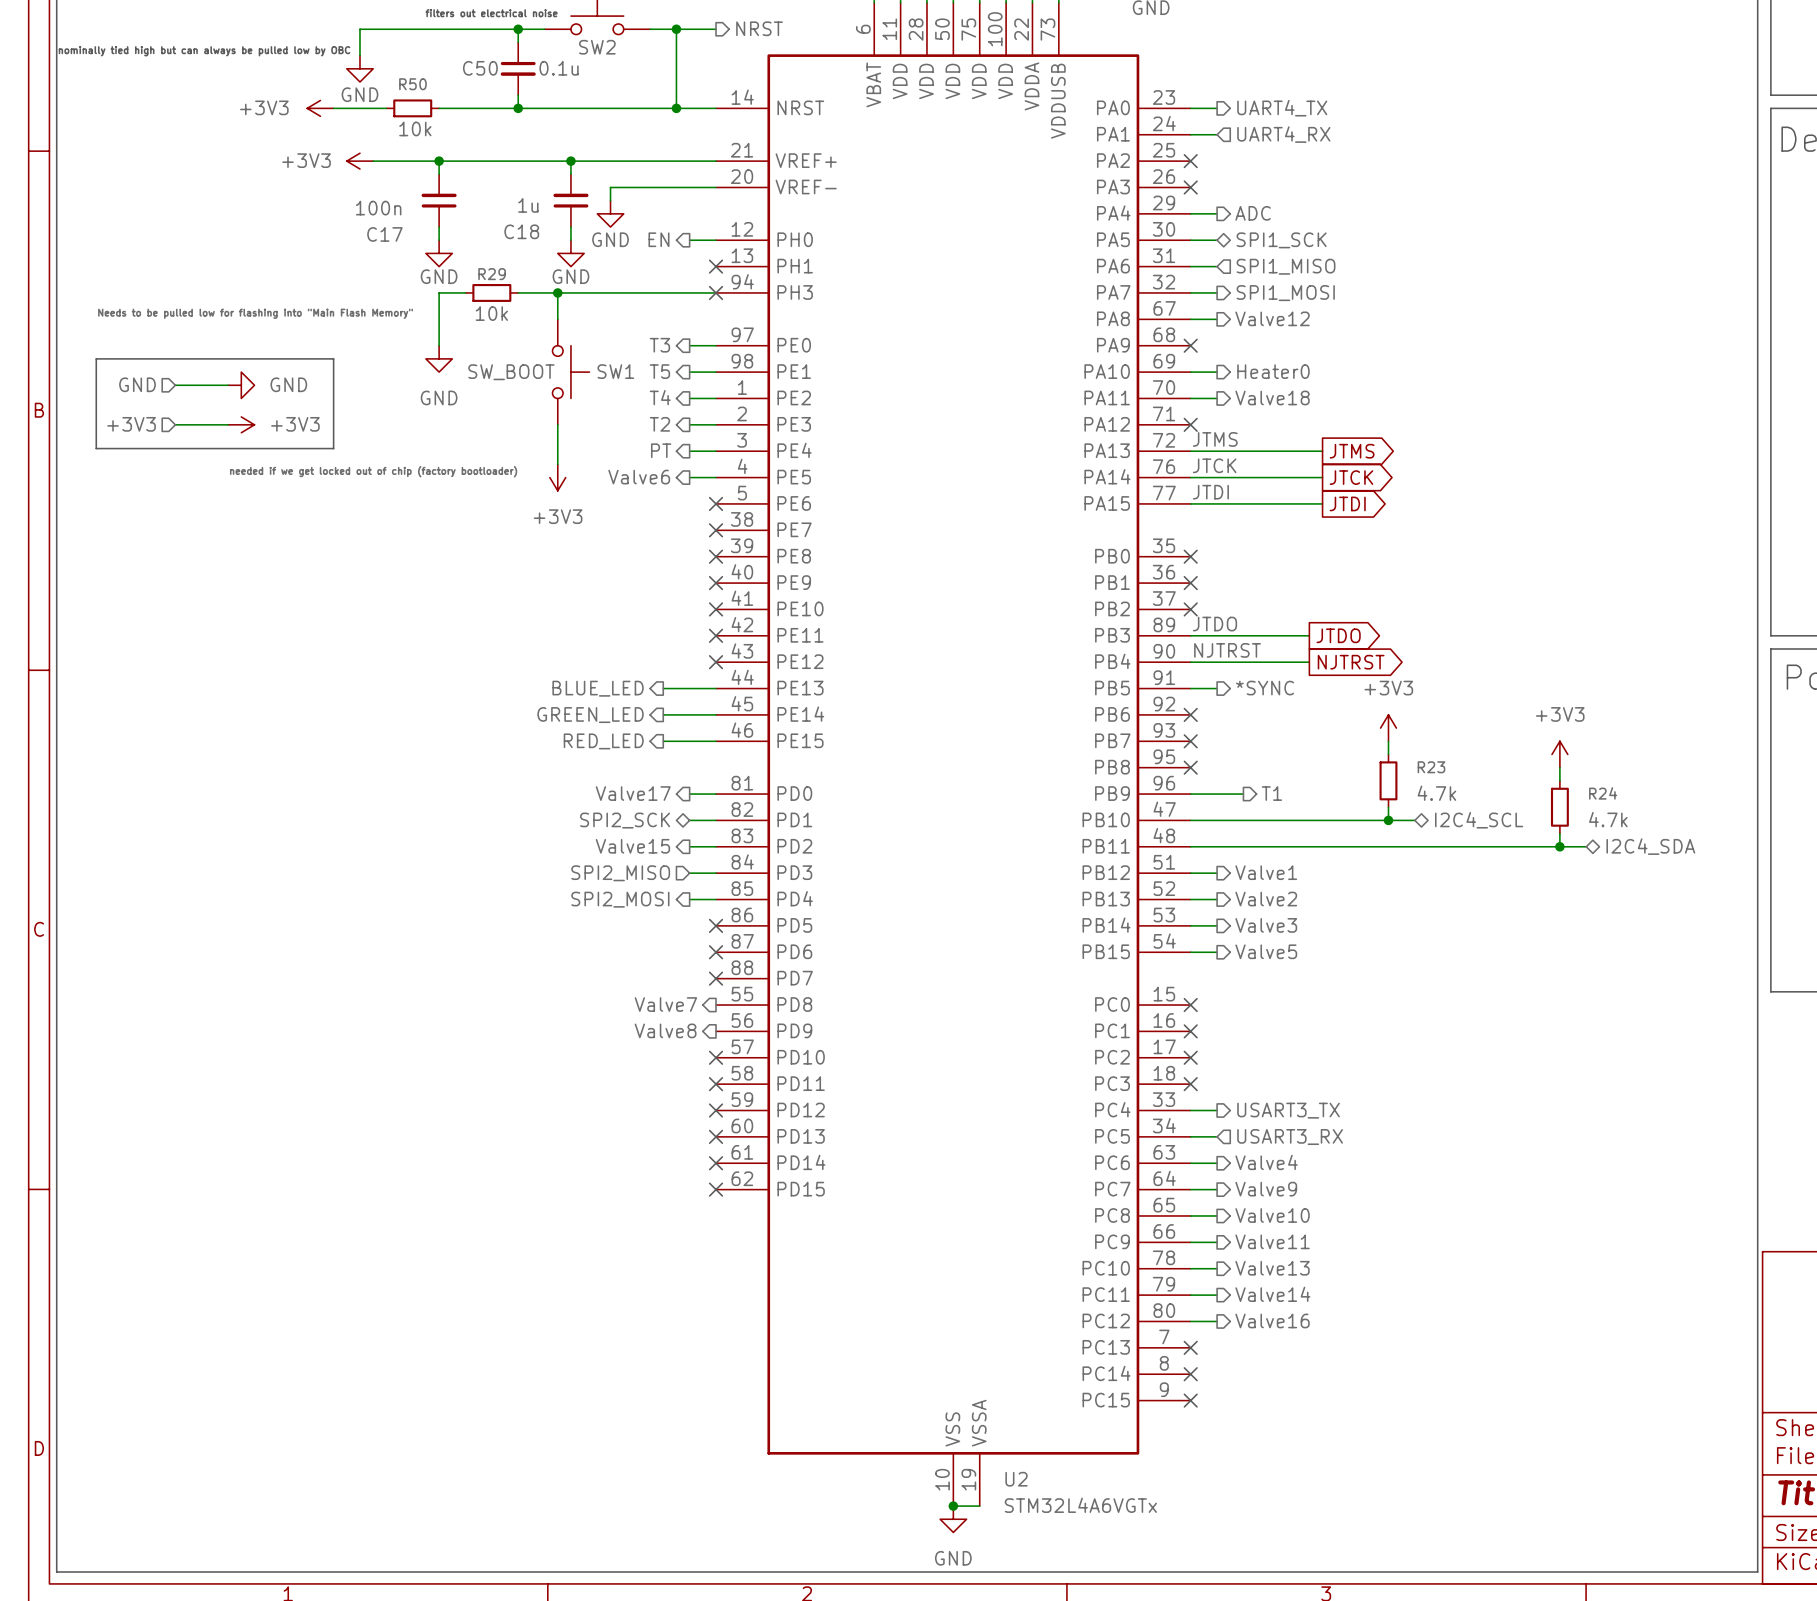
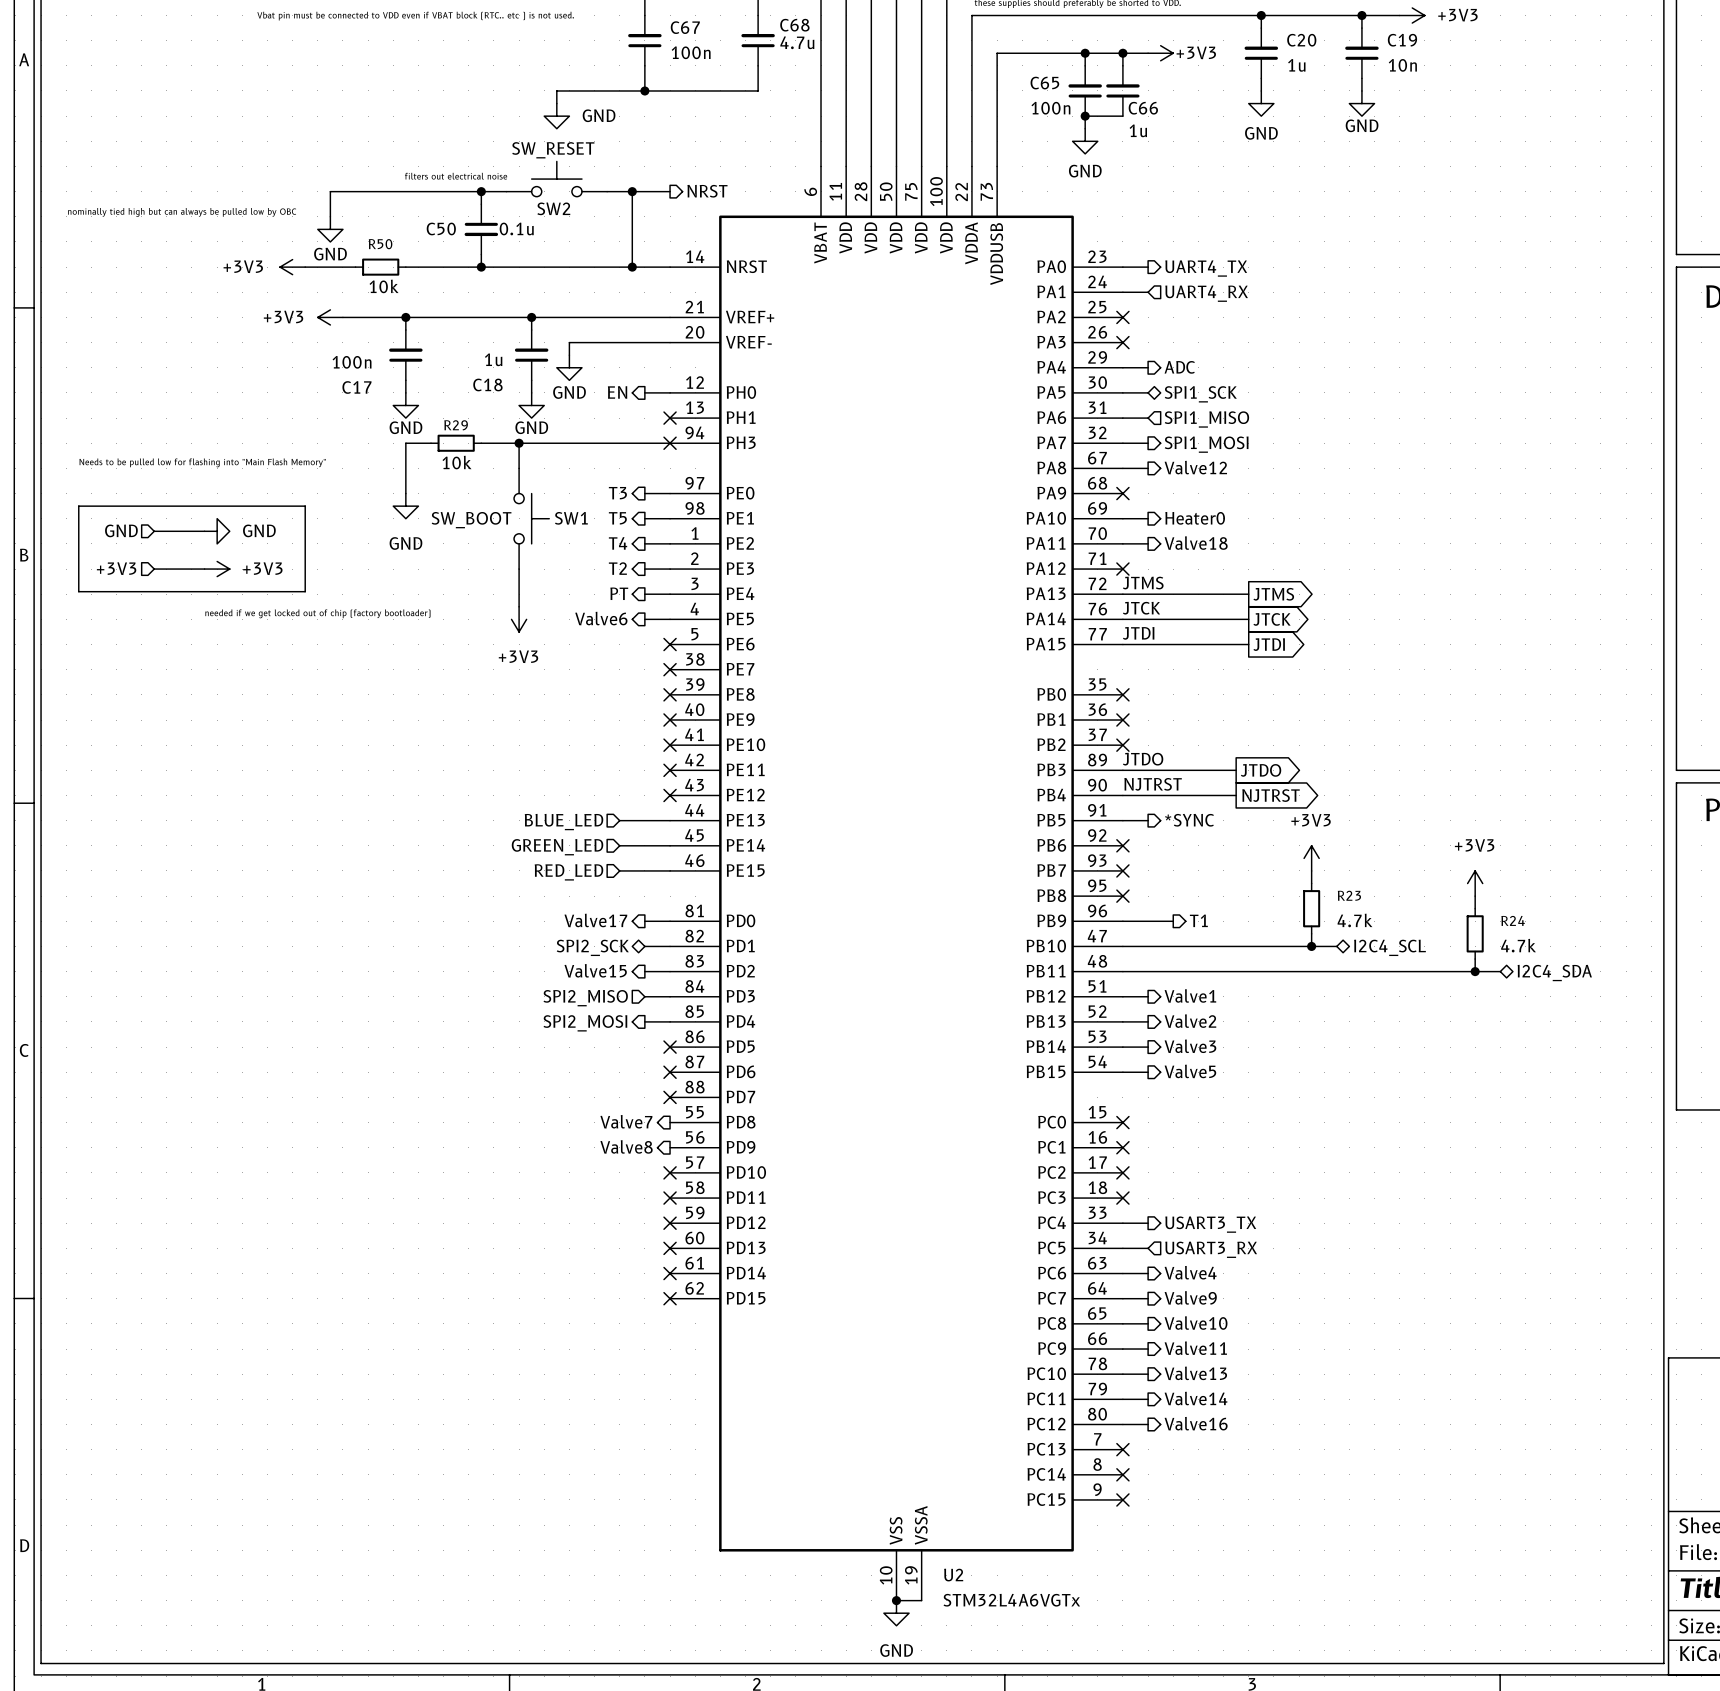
hierarchical label shape: output (598, 688) -> input (564, 822)
hierarchical label shape: output (590, 715) -> input (557, 847)
hierarchical label shape: output (603, 741) -> input (568, 872)

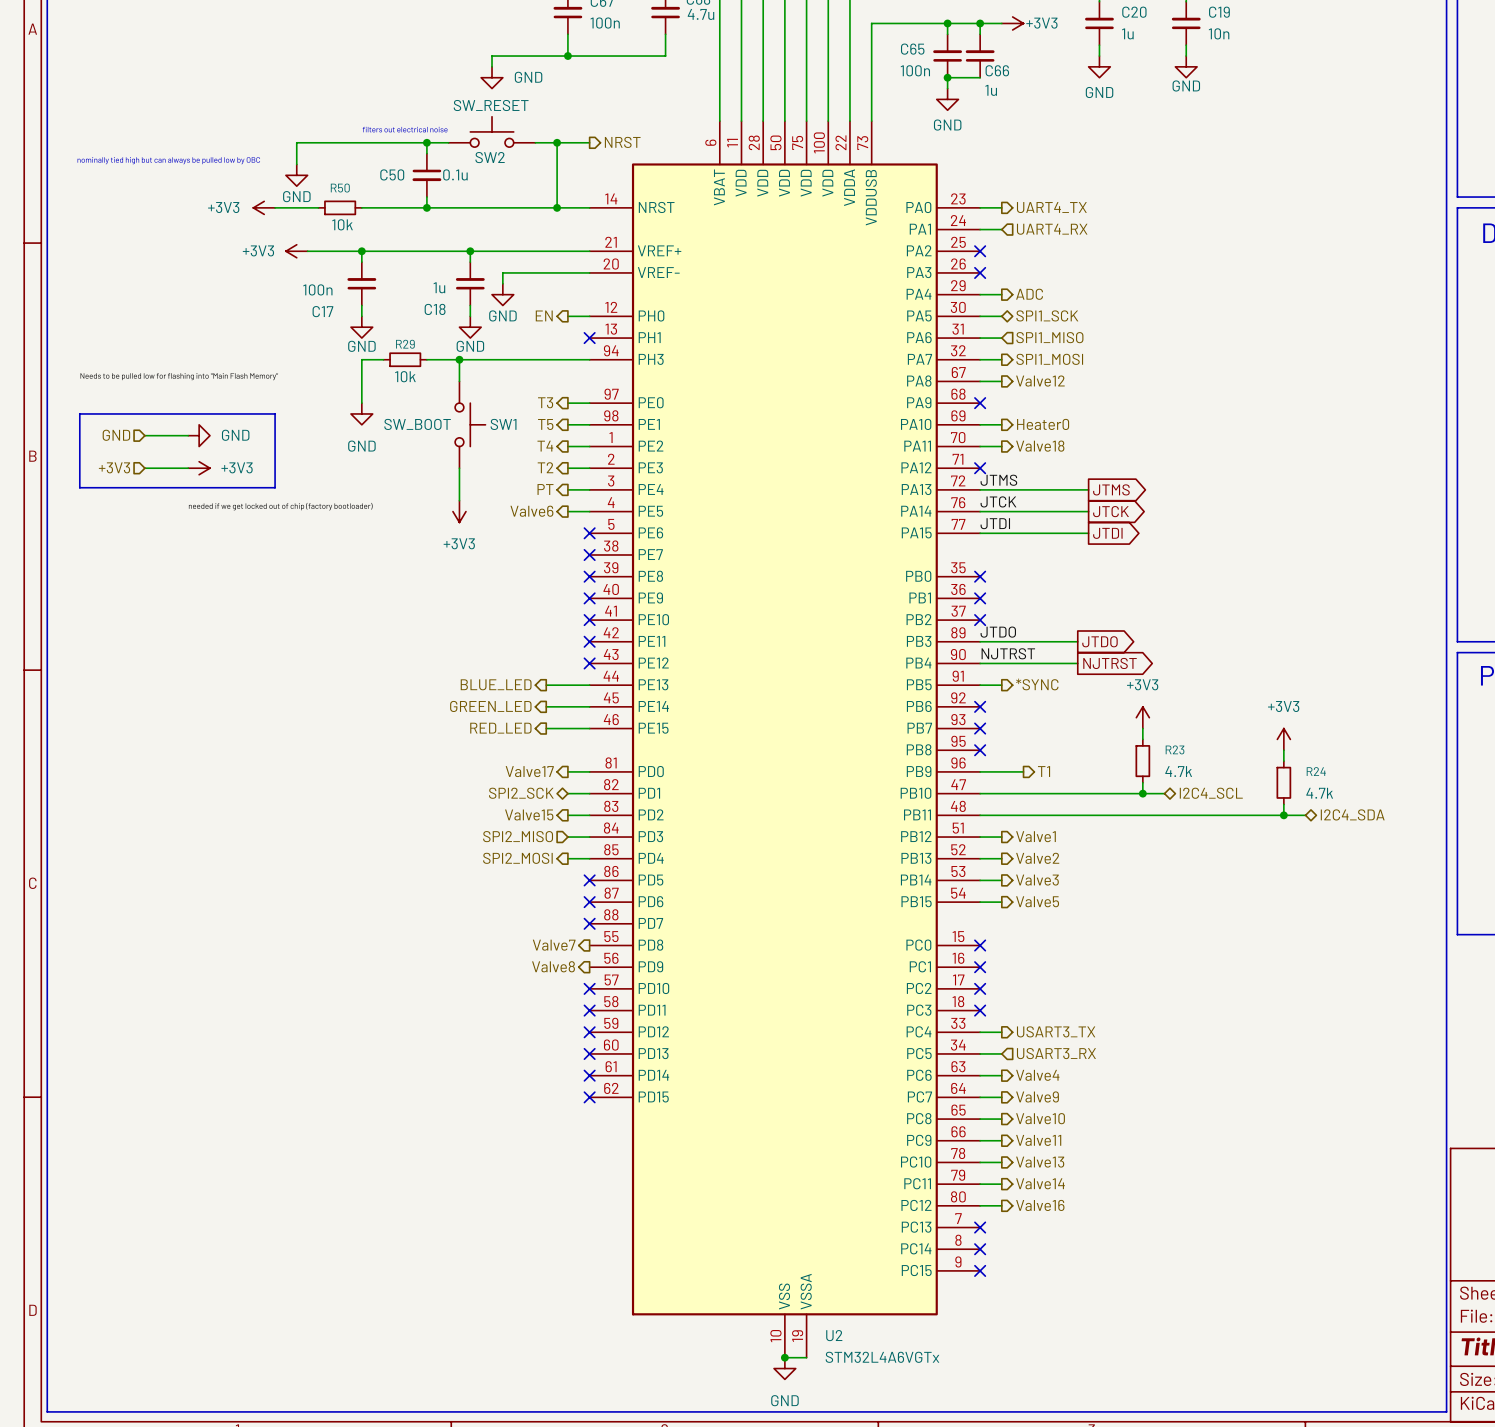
no-connect mark: (670, 443) -> none
hierarchical label shape: input (564, 822) -> output (496, 684)
hierarchical label shape: input (557, 847) -> output (490, 706)
hierarchical label shape: input (568, 872) -> output (500, 728)

